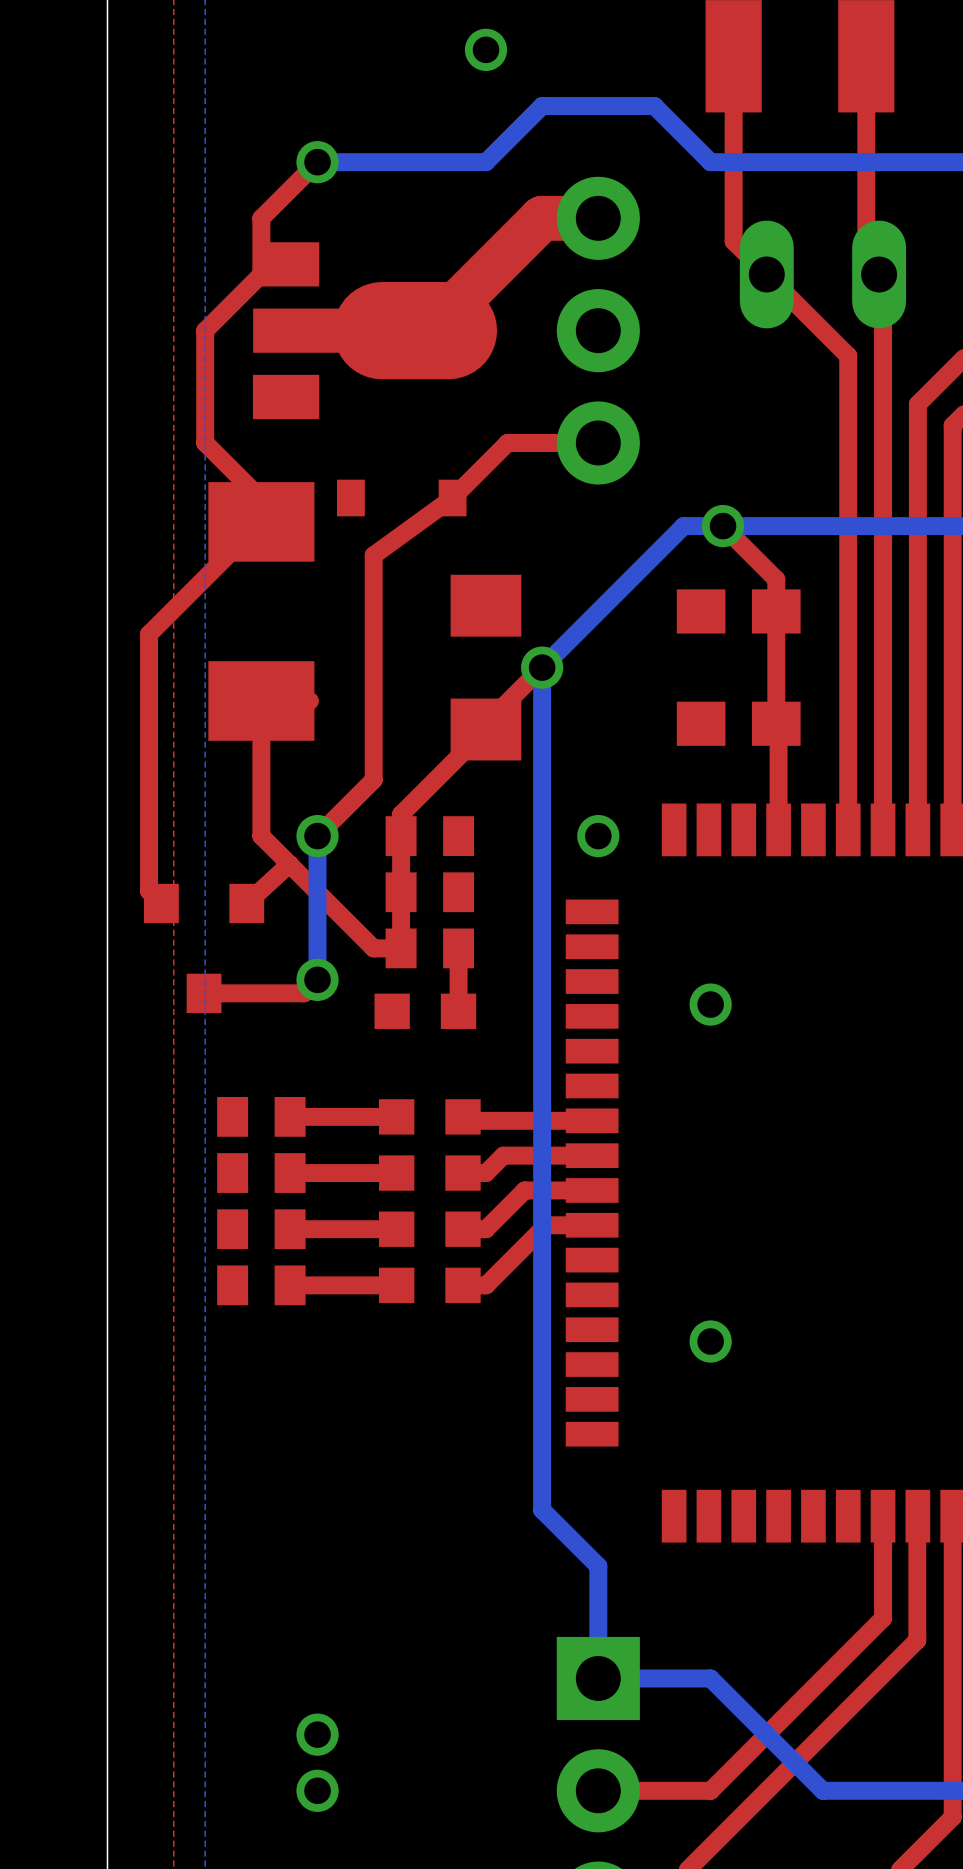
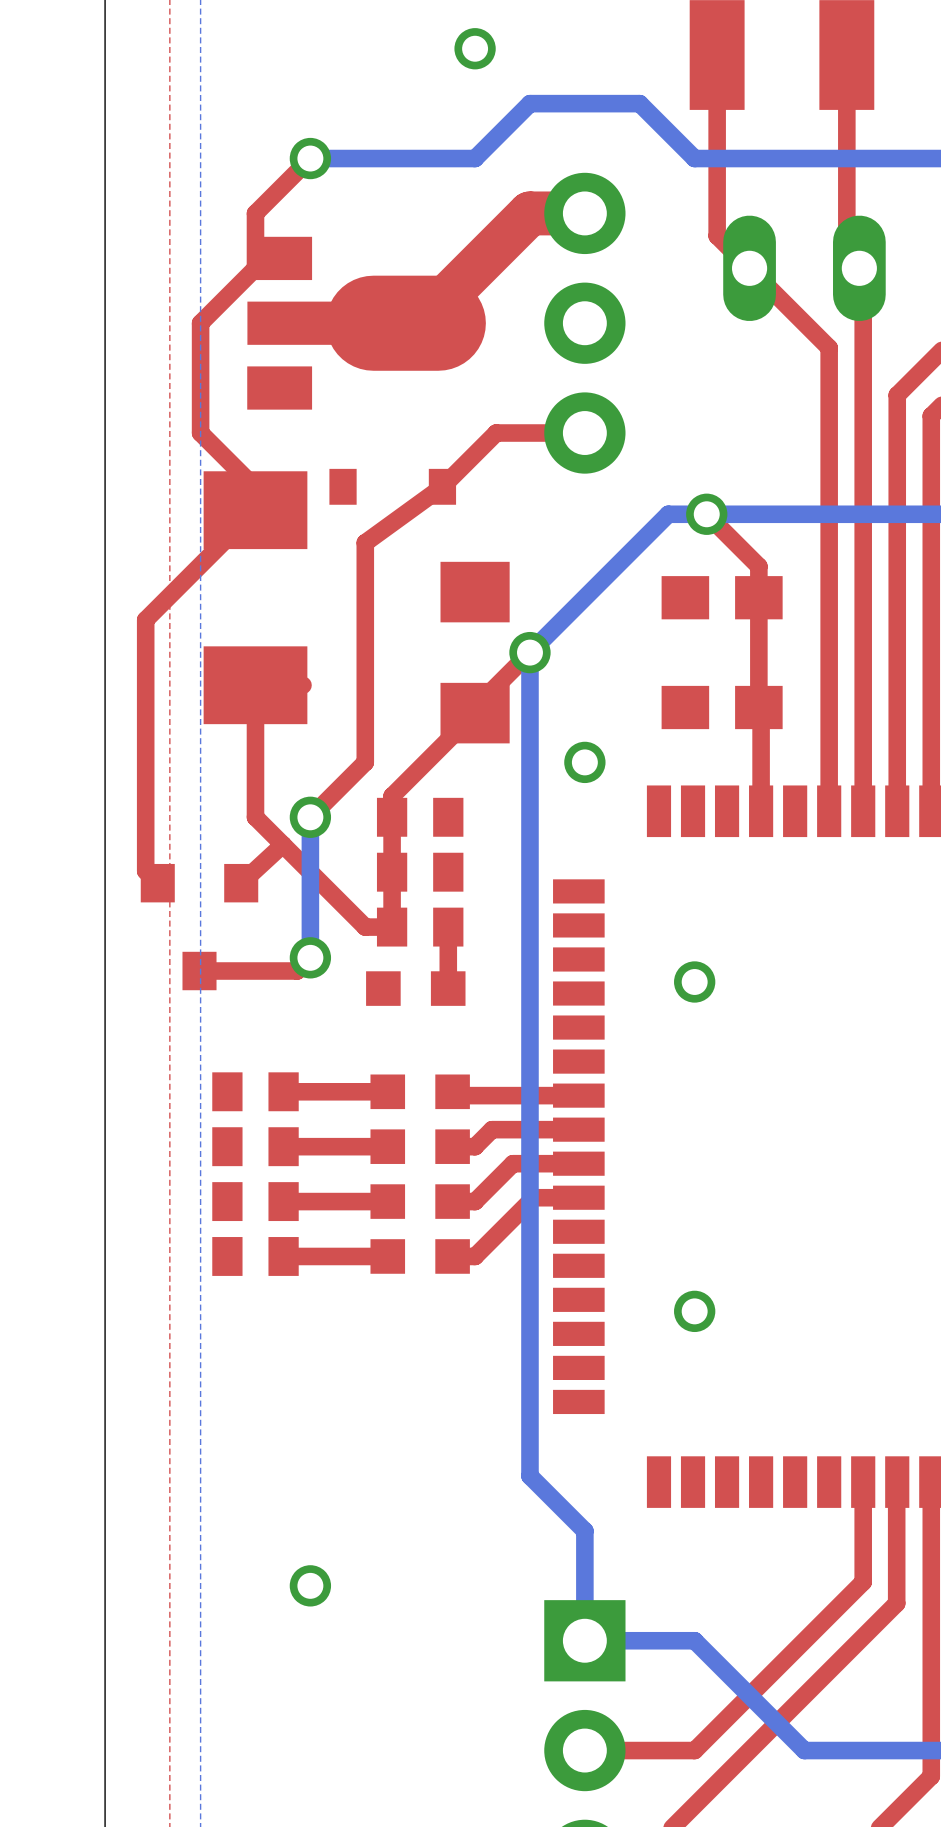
via position: (598, 836) -> (584, 762)
via: none -> (310, 1585)
via: (317, 1734) -> none
via: (317, 1790) -> none

